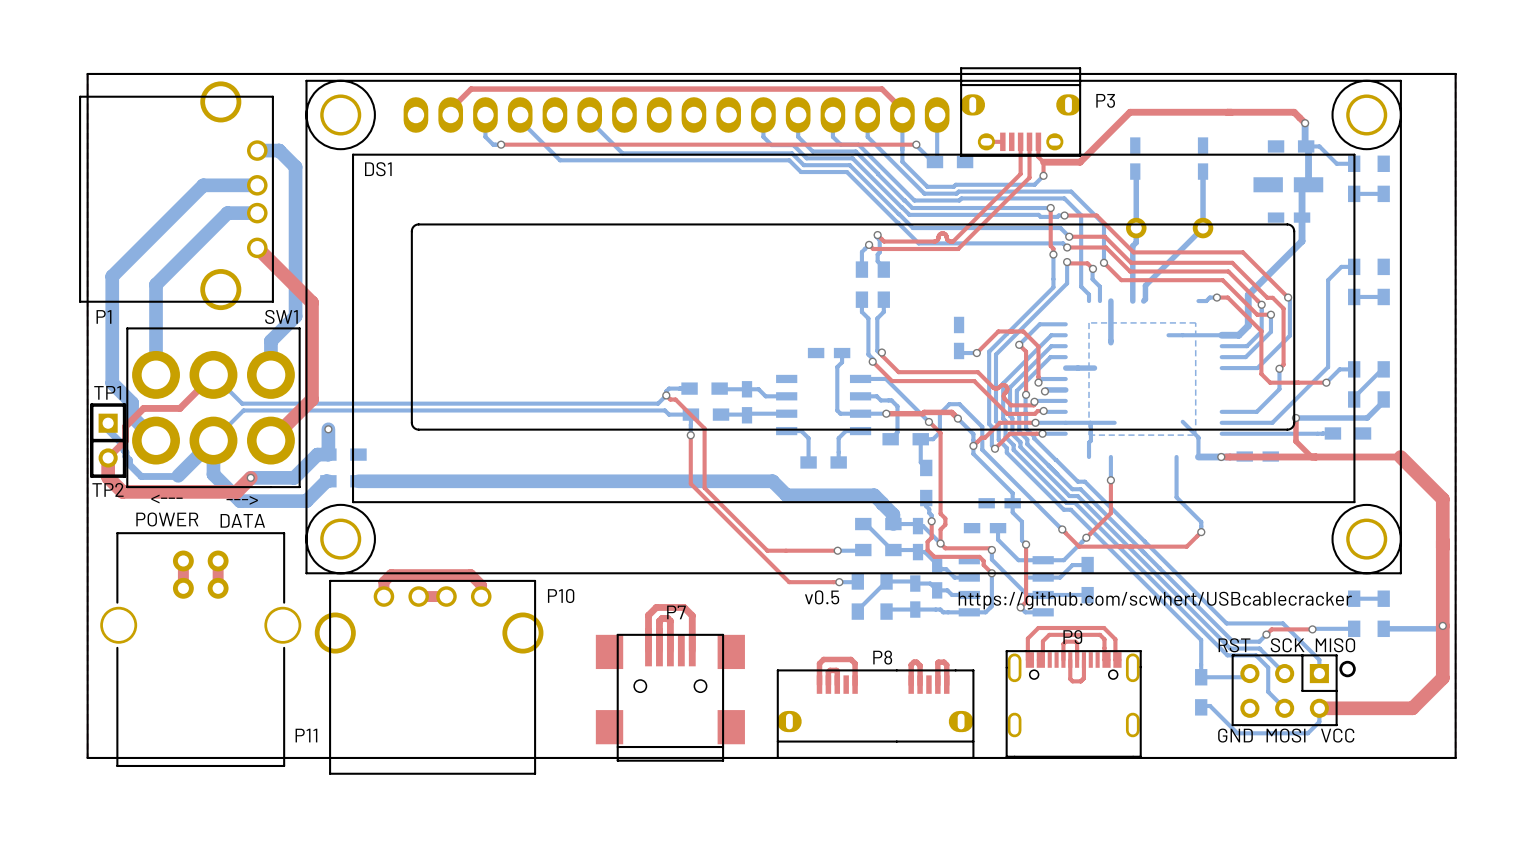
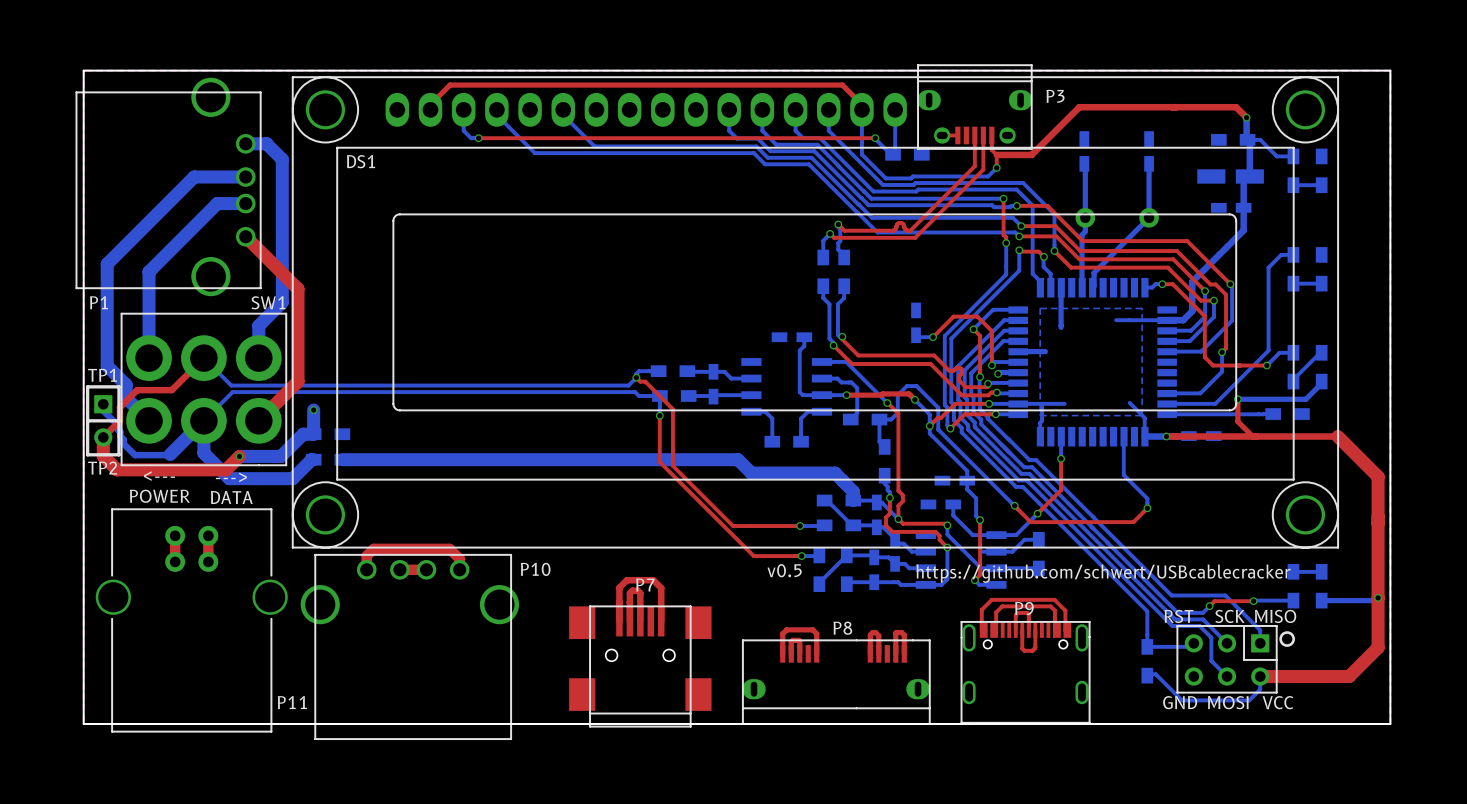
part: none -> (1092, 362)
text: https://github.com/scwhert/USBcablecracker (1155, 600) -> https://github.com/schwert/USBcablecracker (1103, 573)

